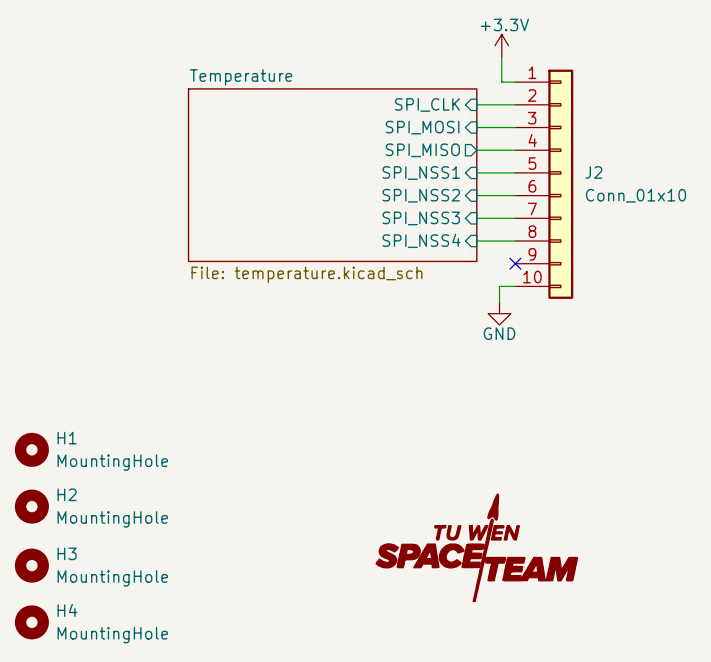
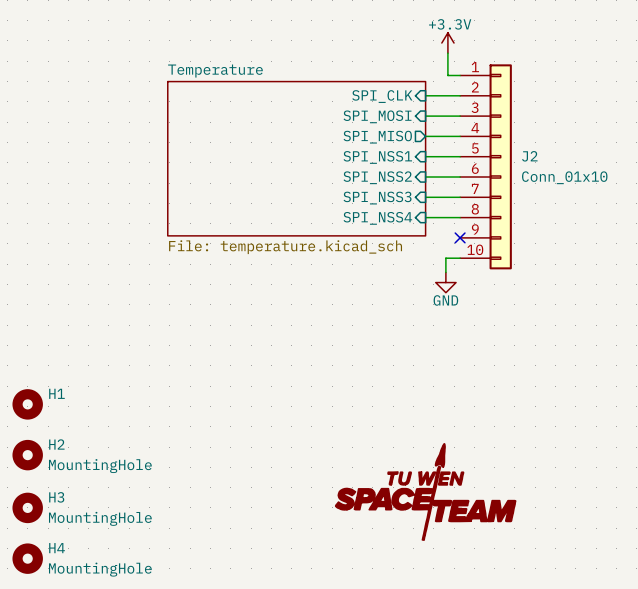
H1 value: MountingHole (112, 462) -> none

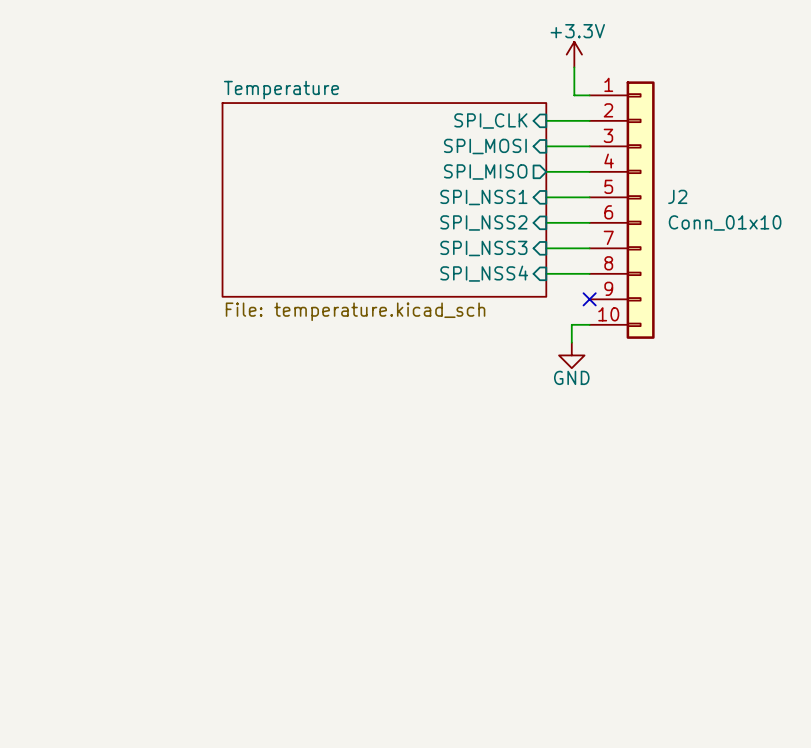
H1: (27, 404) -> none
H2: MountingHole (27, 455) -> none
power symbol: (425, 491) -> none
H3: MountingHole (27, 507) -> none
H4: MountingHole (27, 558) -> none

